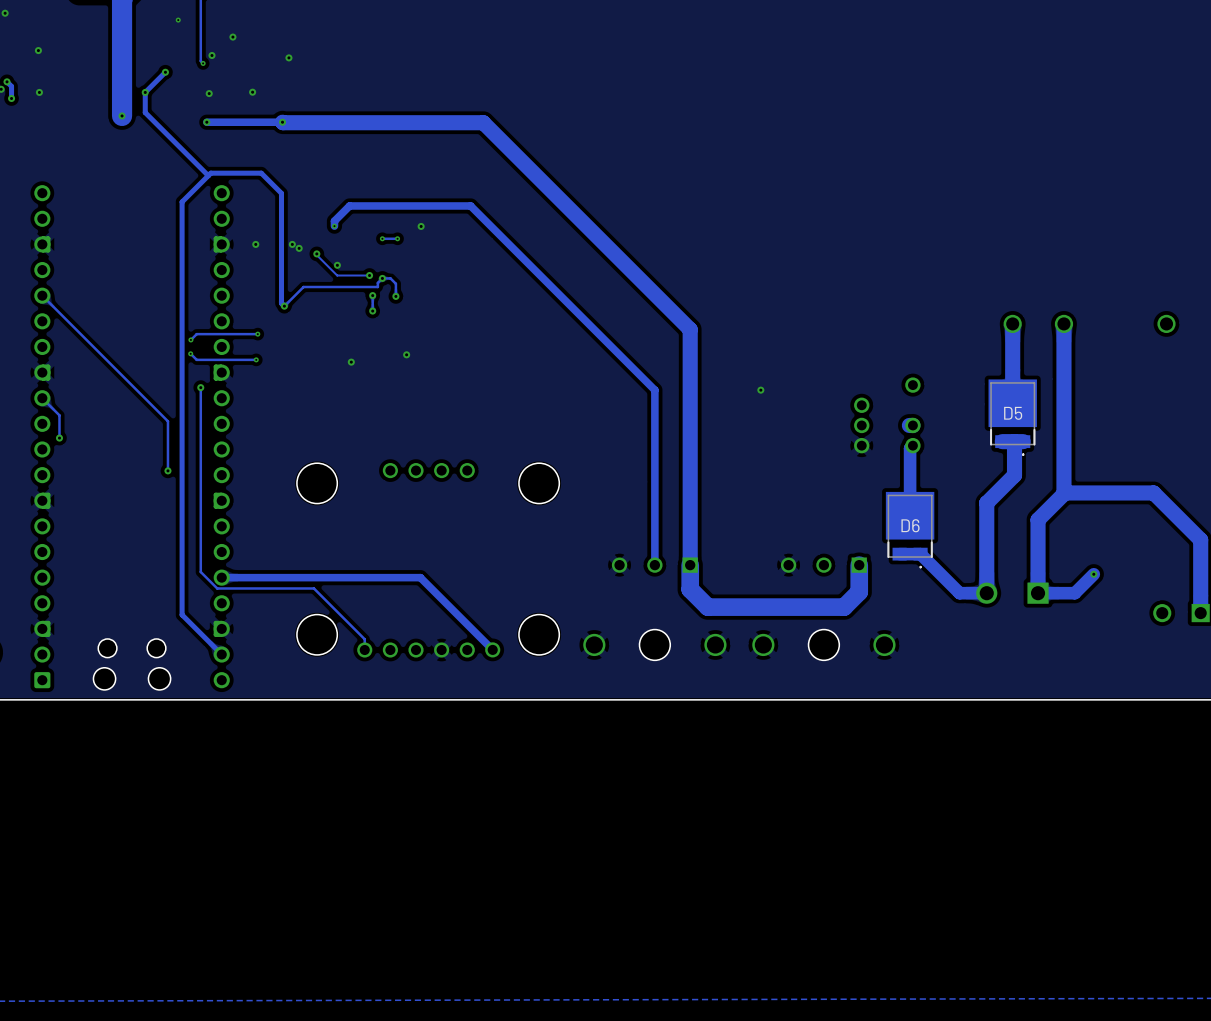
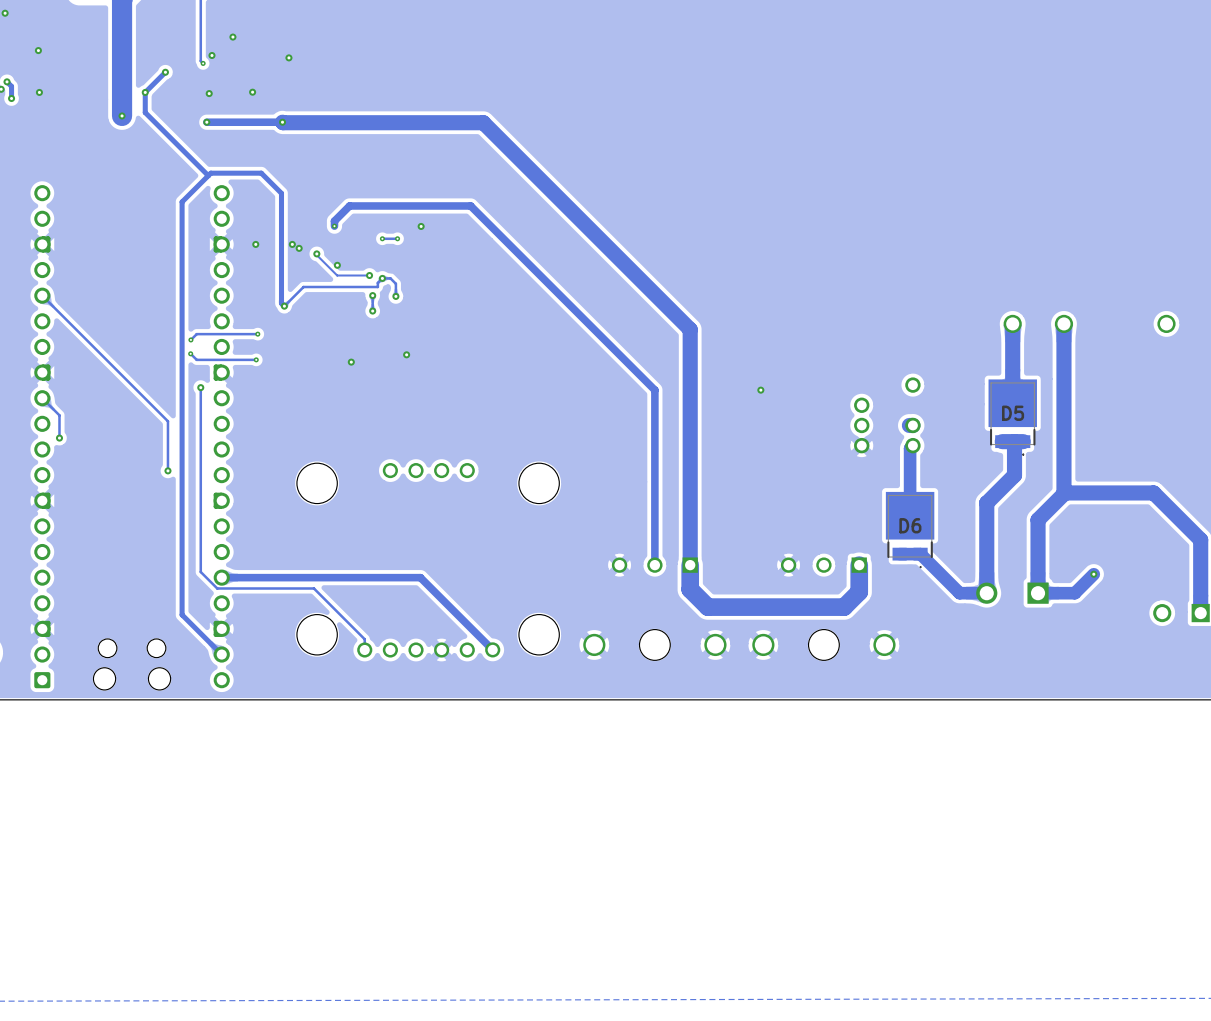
via: (178, 20) -> none

